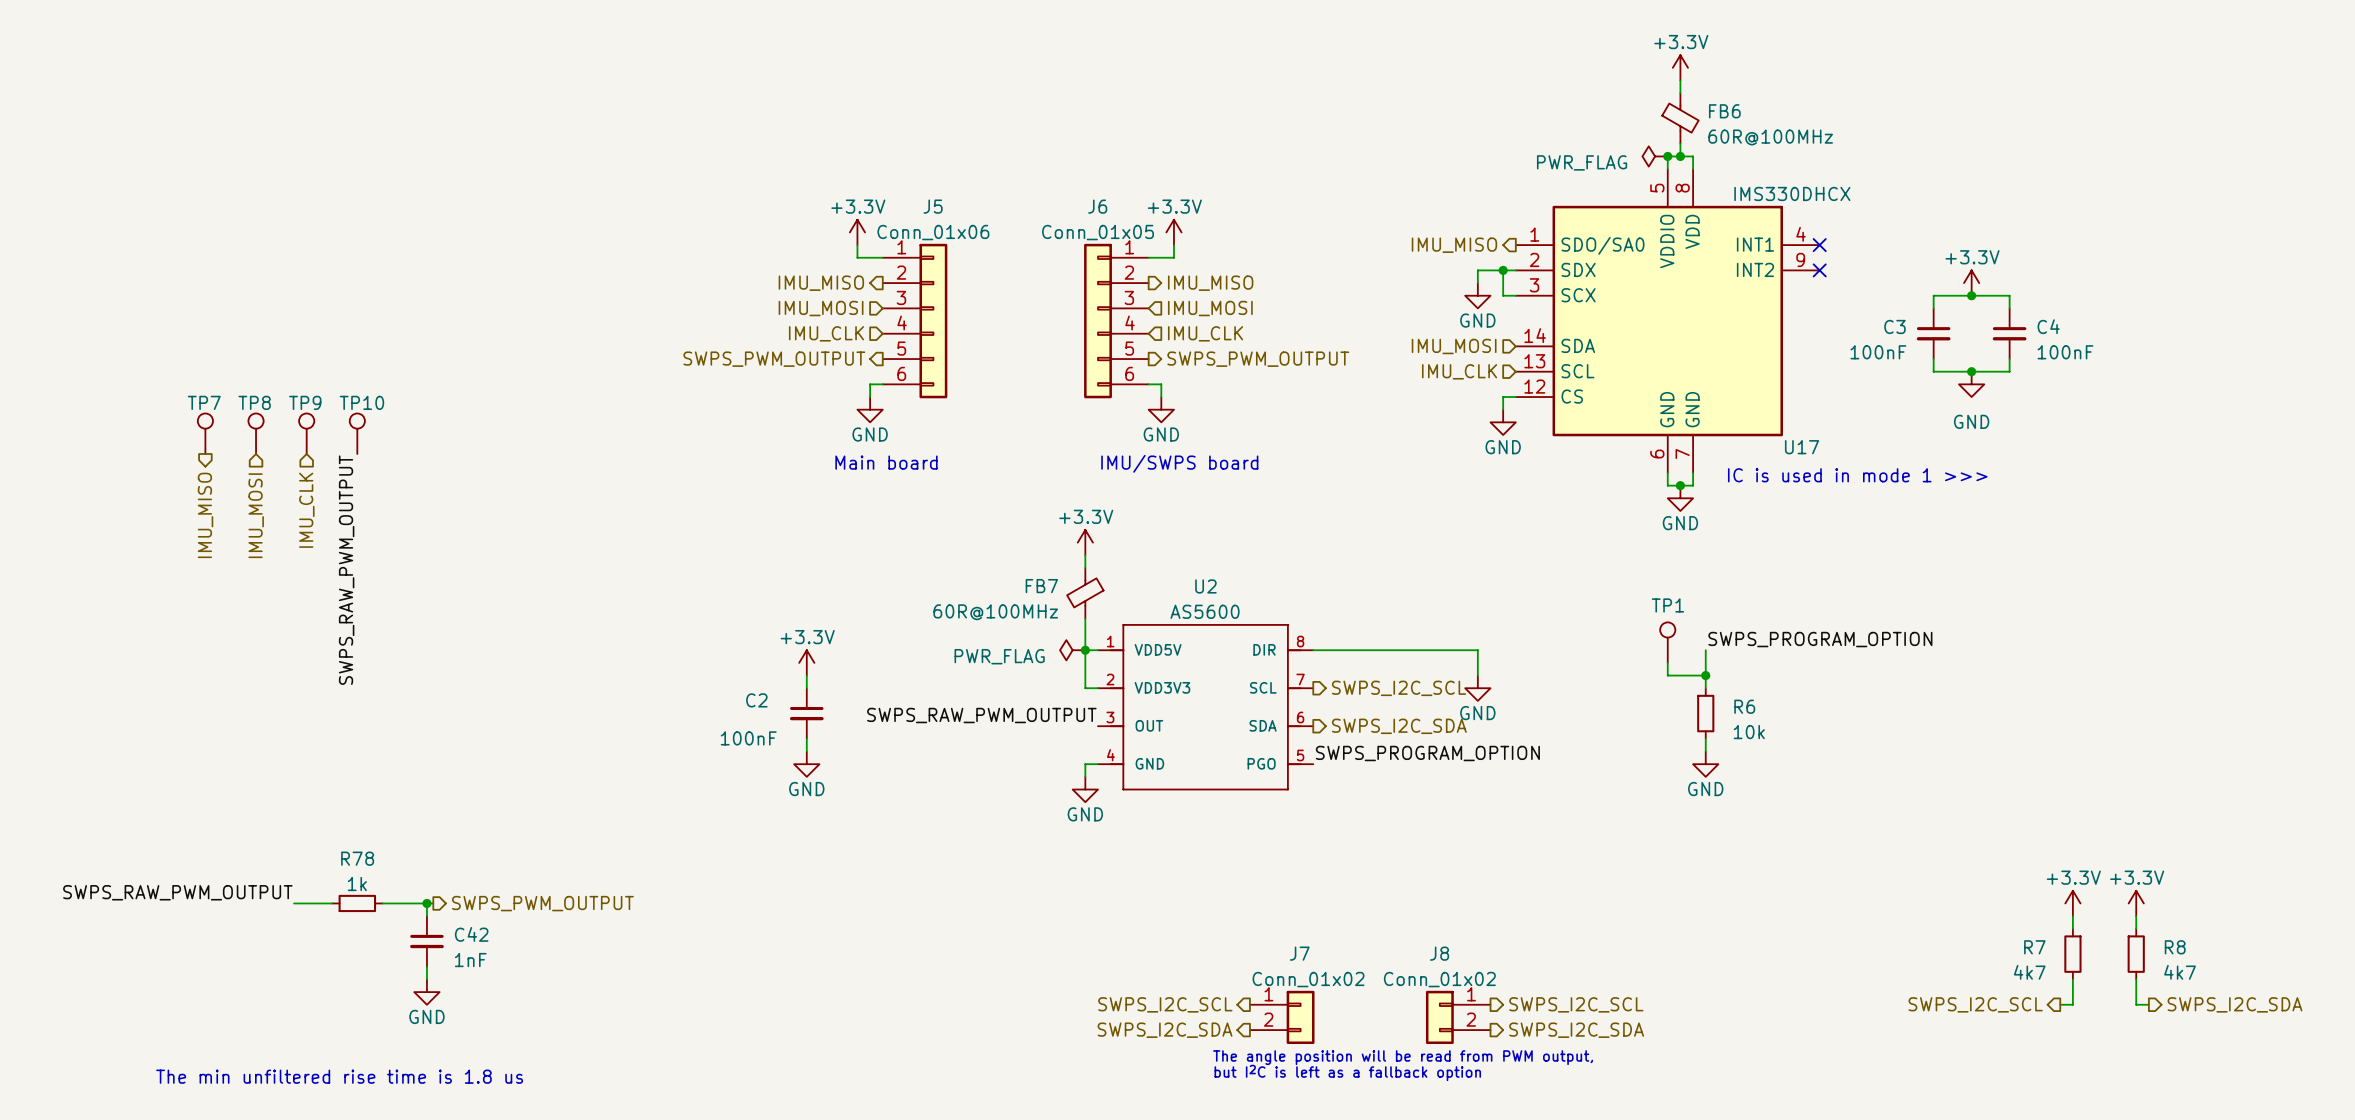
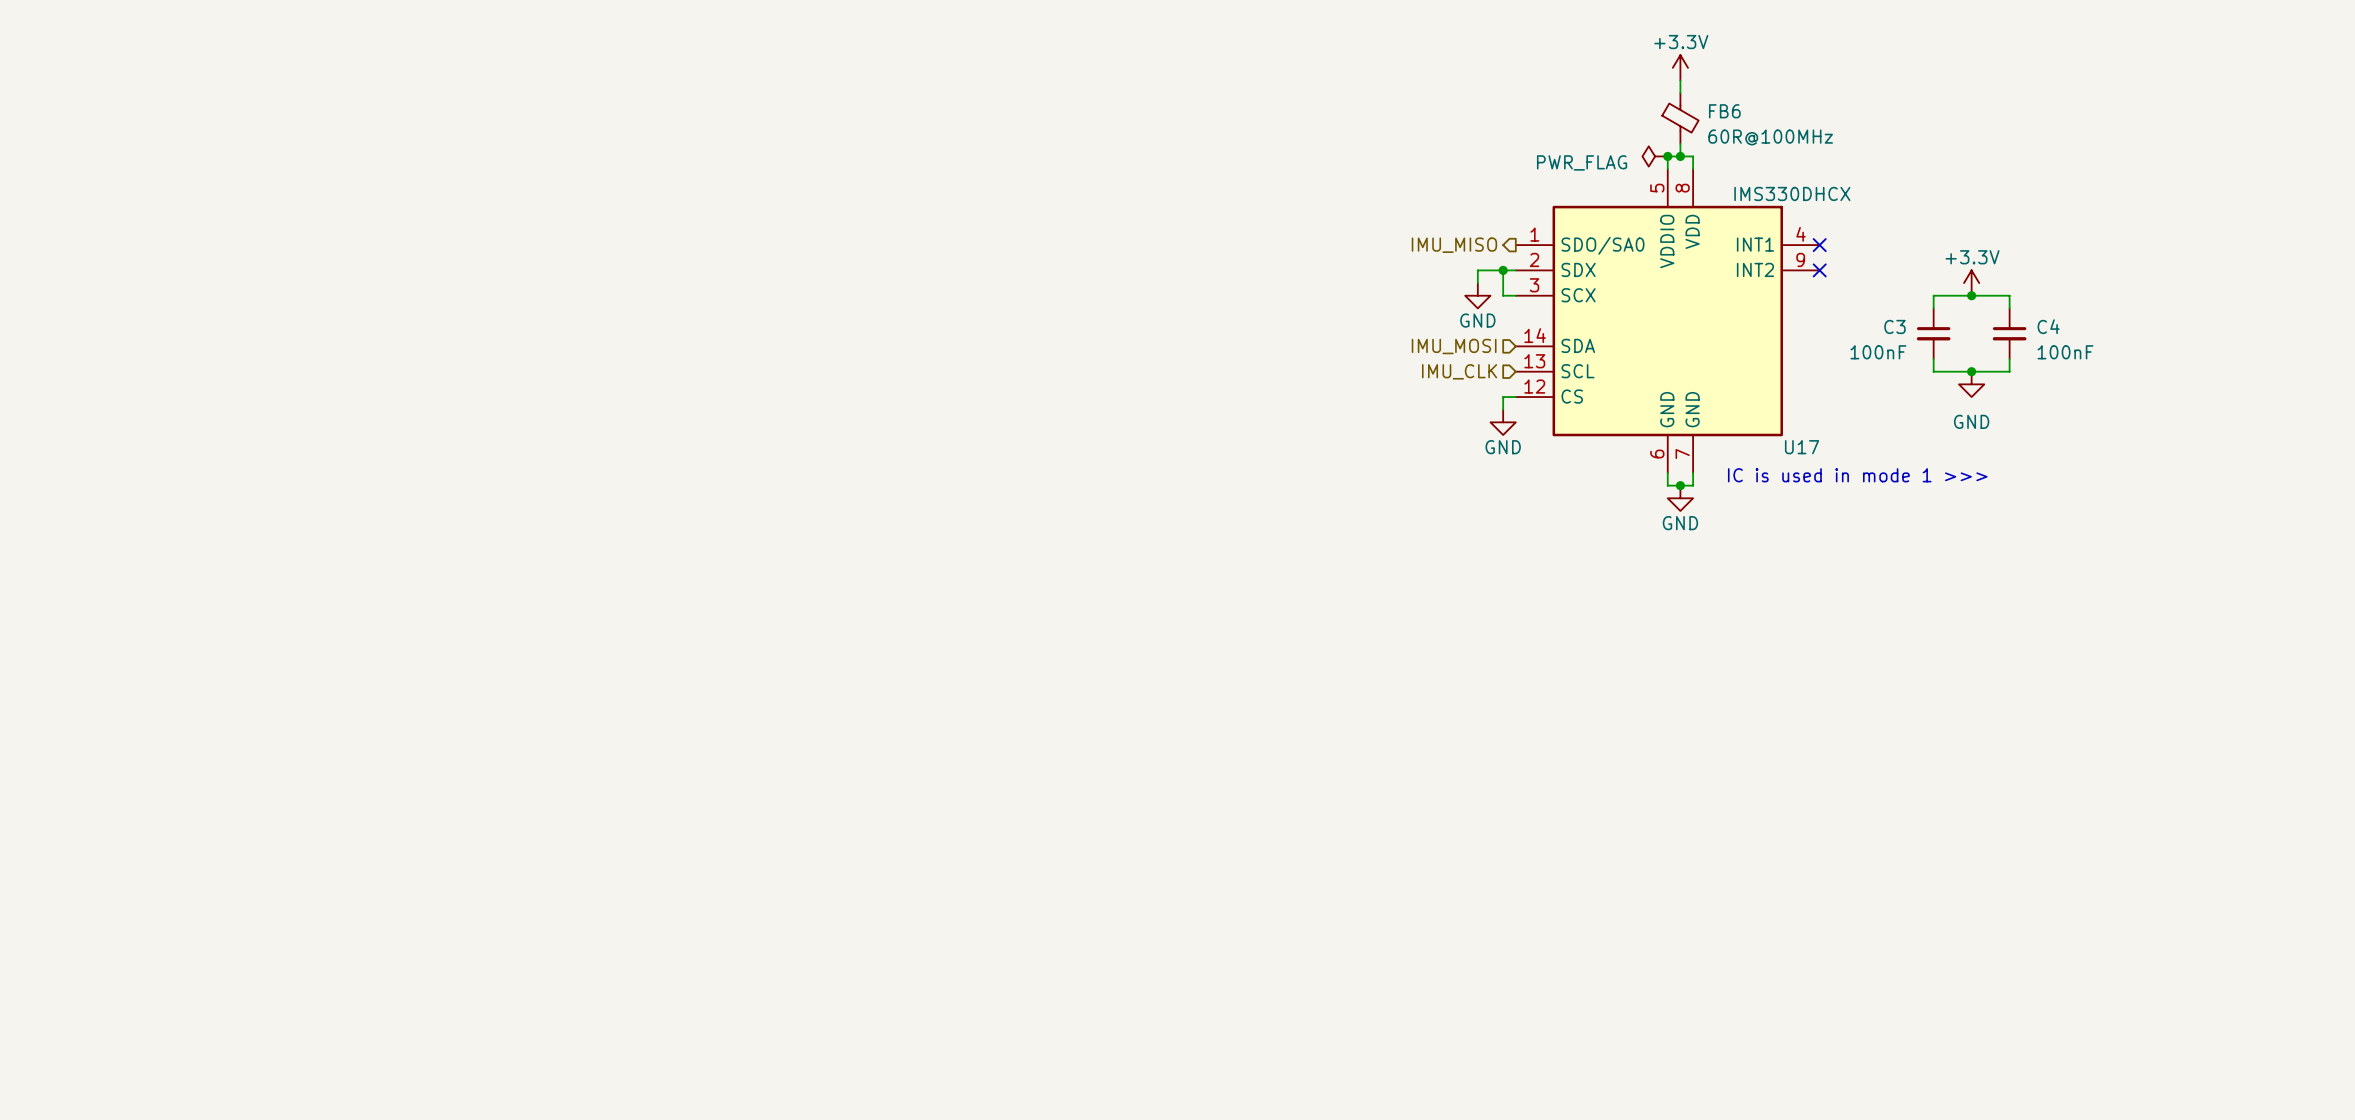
power symbol: +3.3V (857, 232) -> none
power symbol: +3.3V (1173, 232) -> none
wire: (857, 245) (857, 257) (882, 257) -> none
wire: (1173, 245) (1173, 257) (1148, 257) -> none
hierarchical label: IMU_MISO (821, 283) -> none
hierarchical label: IMU_MISO (1210, 283) -> none
hierarchical label: IMU_MOSI (821, 308) -> none
hierarchical label: IMU_MOSI (1210, 308) -> none
J5: Conn_01x06 (915, 321) -> none
J6: Conn_01x05 (1116, 321) -> none
hierarchical label: IMU_CLK (826, 333) -> none
hierarchical label: IMU_CLK (1205, 333) -> none
hierarchical label: SWPS_PWM_OUTPUT (774, 359) -> none
hierarchical label: SWPS_PWM_OUTPUT (1258, 359) -> none
wire: (882, 384) (870, 384) (870, 397) -> none
wire: (1148, 384) (1161, 384) (1161, 397) -> none
power symbol: GND (870, 409) -> none
power symbol: GND (1161, 409) -> none
TP7: (205, 433) -> none
TP8: (256, 433) -> none
TP9: (306, 433) -> none
TP10: (357, 433) -> none
text: Main board (886, 462) -> none
text: IMU/SWPS board (1179, 463) -> none
hierarchical label: IMU_CLK (306, 510) -> none
hierarchical label: IMU_MISO (205, 515) -> none
hierarchical label: IMU_MOSI (256, 515) -> none
power symbol: +3.3V (1085, 542) -> none
wire: (1085, 555) (1085, 567) -> none
label: SWPS_RAW_PWM_OUTPUT (346, 570) -> none
FB7: 60R@100MHz (1085, 593) -> none
wire: (1085, 618) (1085, 688) (1098, 688) -> none
label: SWPS_PROGRAM_OPTION (1820, 639) -> none
TP1: (1667, 642) -> none
power symbol: PWR_FLAG (1072, 650) -> none
wire: (1085, 650) (1098, 650) -> none
junction: (1085, 650) -> none
wire: (1313, 650) (1477, 650) (1477, 675) -> none
wire: (1705, 650) (1705, 688) -> none
power symbol: +3.3V (806, 662) -> none
wire: (1667, 662) (1667, 675) (1705, 675) -> none
wire: (806, 675) (806, 688) -> none
junction: (1705, 675) -> none
hierarchical label: SWPS_I2C_SCL (1399, 688) -> none
power symbol: GND (1477, 688) -> none
U2: AS5600 (1205, 707) -> none
C2: 100nF (806, 713) -> none
R6: 10k (1705, 713) -> none
label: SWPS_RAW_PWM_OUTPUT (981, 715) -> none
hierarchical label: SWPS_I2C_SDA (1399, 726) -> none
wire: (806, 738) (806, 751) -> none
wire: (1705, 738) (1705, 751) -> none
label: SWPS_PROGRAM_OPTION (1427, 753) -> none
power symbol: GND (806, 764) -> none
wire: (1098, 764) (1085, 764) (1085, 776) -> none
power symbol: GND (1705, 764) -> none
power symbol: GND (1085, 789) -> none
label: SWPS_RAW_PWM_OUTPUT (177, 892) -> none
wire: (294, 903) (332, 903) -> none
R78: 1k (357, 903) -> none
wire: (382, 903) (433, 903) -> none
wire: (426, 903) (426, 916) -> none
junction: (426, 903) -> none
hierarchical label: SWPS_PWM_OUTPUT (542, 903) -> none
power symbol: +3.3V (2072, 903) -> none
power symbol: +3.3V (2136, 903) -> none
wire: (2072, 916) (2072, 928) -> none
wire: (2136, 916) (2136, 928) -> none
C42: 1nF (426, 941) -> none
R7: 4k7 (2072, 954) -> none
R8: 4k7 (2136, 954) -> none
wire: (426, 966) (426, 979) -> none
wire: (2072, 979) (2072, 1004) (2060, 1004) -> none
wire: (2136, 979) (2136, 1004) (2148, 1004) -> none
power symbol: GND (426, 992) -> none
hierarchical label: SWPS_I2C_SCL (1165, 1004) -> none
hierarchical label: SWPS_I2C_SCL (1576, 1004) -> none
hierarchical label: SWPS_I2C_SCL (1975, 1004) -> none
hierarchical label: SWPS_I2C_SDA (2235, 1004) -> none
J7: Conn_01x02 (1282, 1017) -> none
J8: Conn_01x02 (1458, 1017) -> none
hierarchical label: SWPS_I2C_SDA (1165, 1030) -> none
hierarchical label: SWPS_I2C_SDA (1576, 1030) -> none
text: The angle position will be read from PWM output, (1403, 1057) -> none
text: but I2C is left as a fallback option (1347, 1072) -> none
text: The min unfiltered rise time is 1.8 us (339, 1076) -> none

